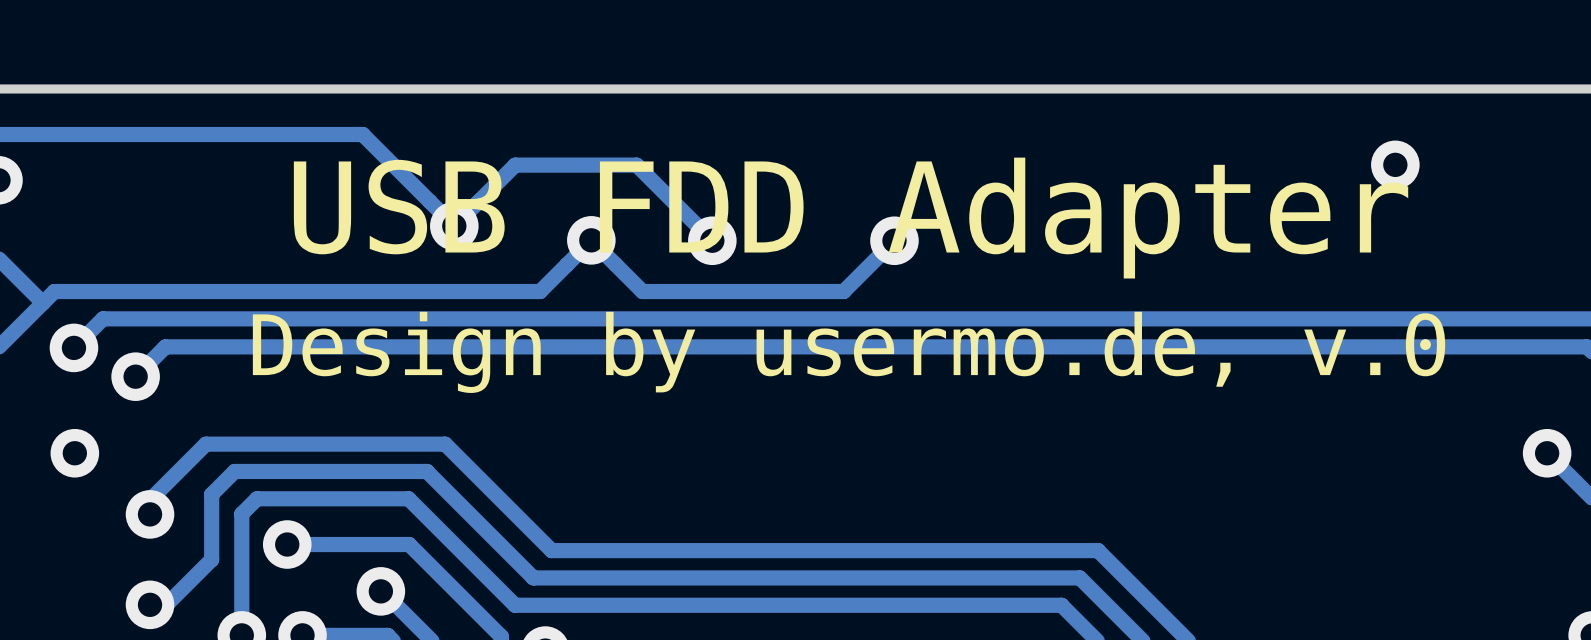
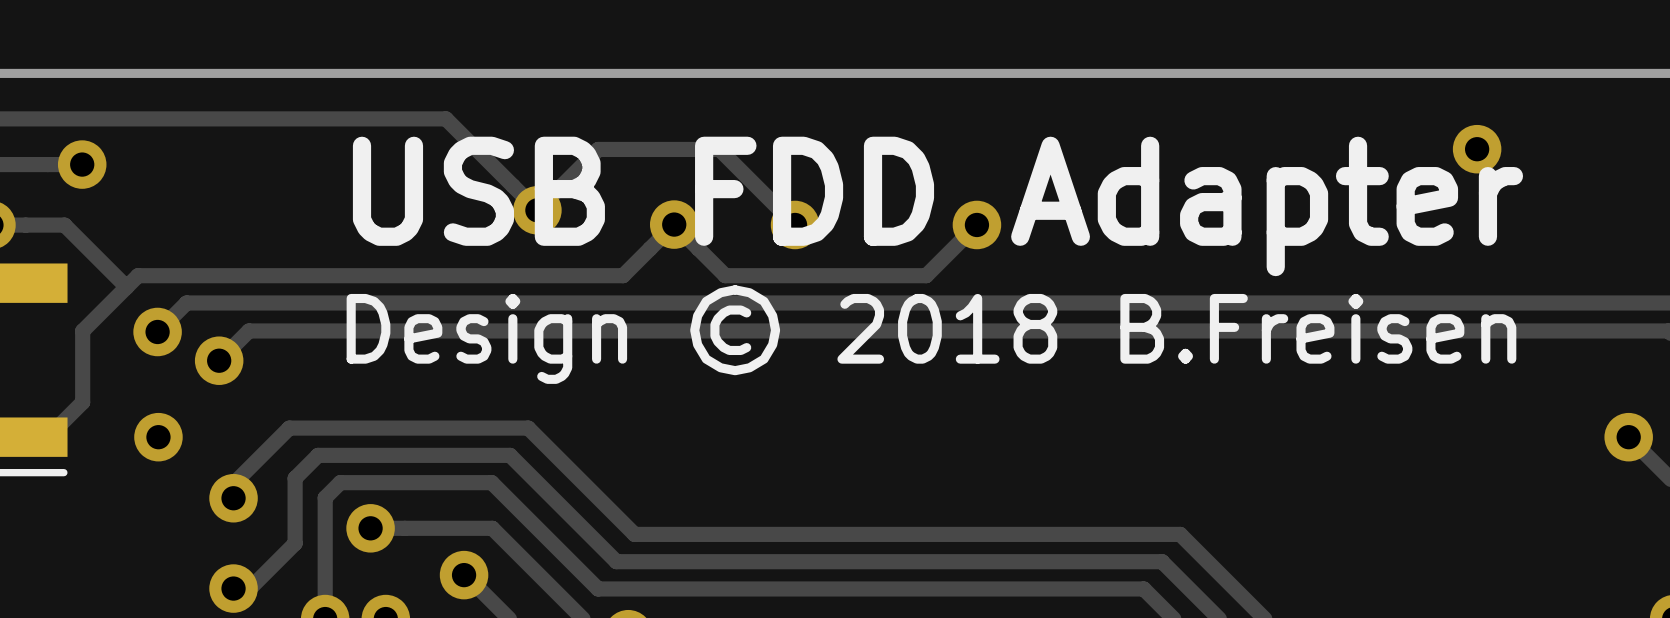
text: Design by usermo.de, v.0 (849, 352) -> Design © 2018 B.Freisen (931, 334)

